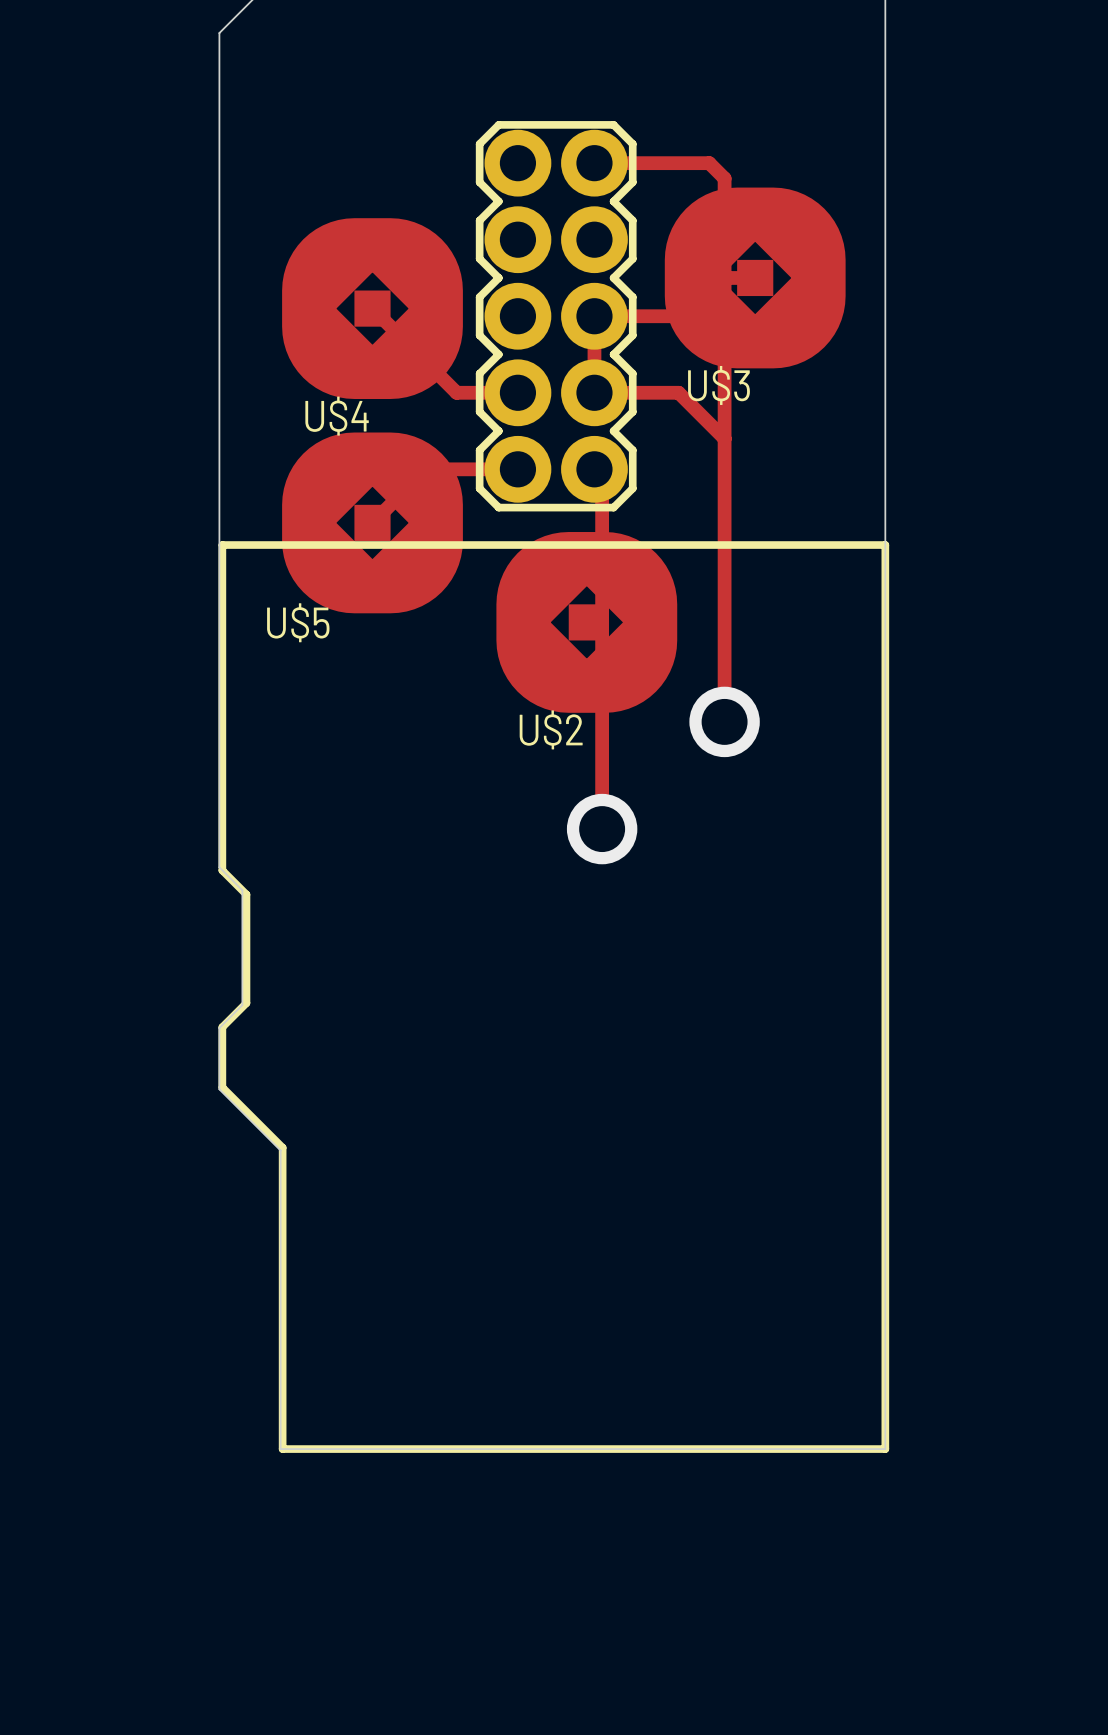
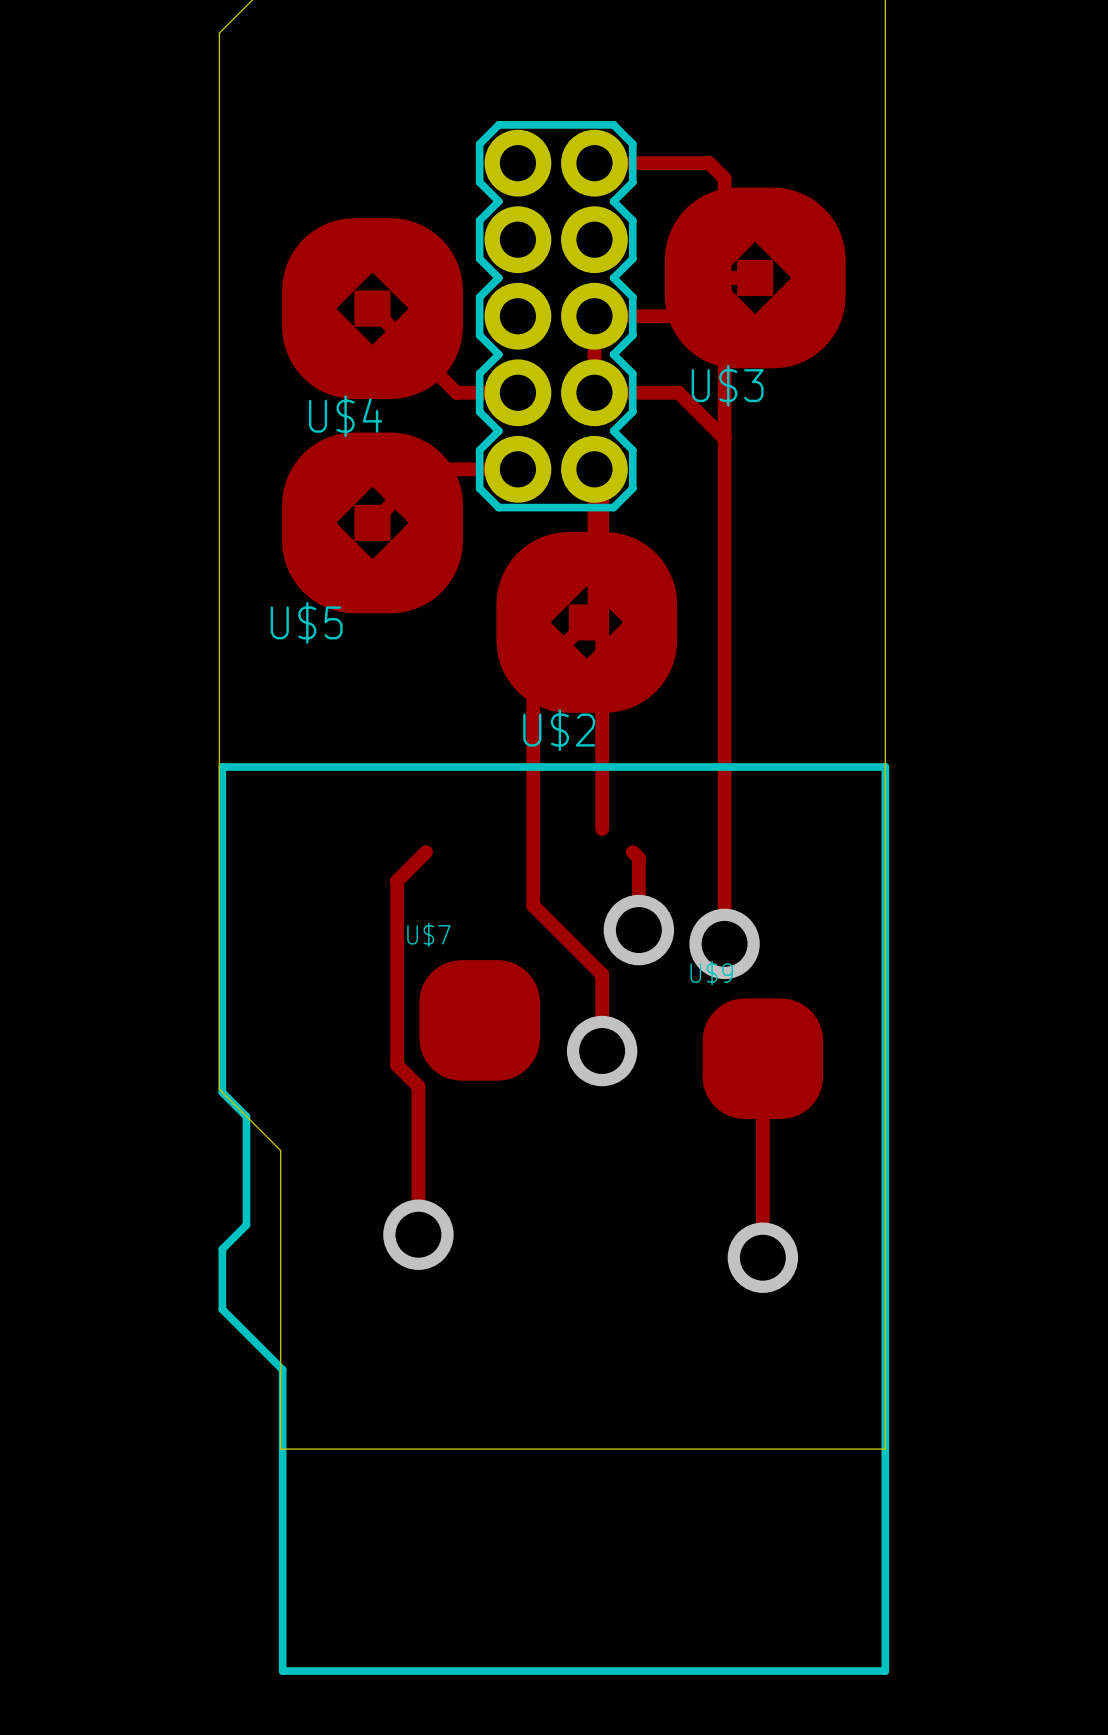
track: none -> (594, 469) (594, 614) (533, 675) (533, 905) (602, 974) (602, 1051)
track: none -> (724, 721) (724, 943)
via: (724, 721) -> none
via: (602, 829) -> none
track: none -> (426, 852) (397, 880) (397, 1065) (418, 1086) (418, 1234)
track: none -> (632, 852) (638, 858) (638, 930)
board edge: (219, 867) (242, 890) (242, 1005) (219, 1028) -> (219, 867) (219, 1028)
via: none -> (638, 930)
via: none -> (724, 943)
part position: (553, 997) -> (553, 1219)
U$7: none -> (479, 1020)
via: none -> (602, 1051)
track: none -> (762, 1058) (762, 1257)
U$9: none -> (762, 1058)
via: none -> (418, 1234)
via: none -> (762, 1257)

